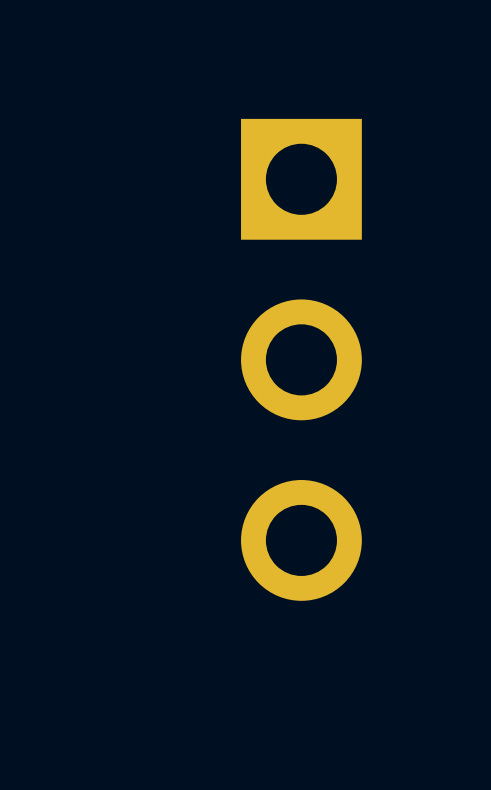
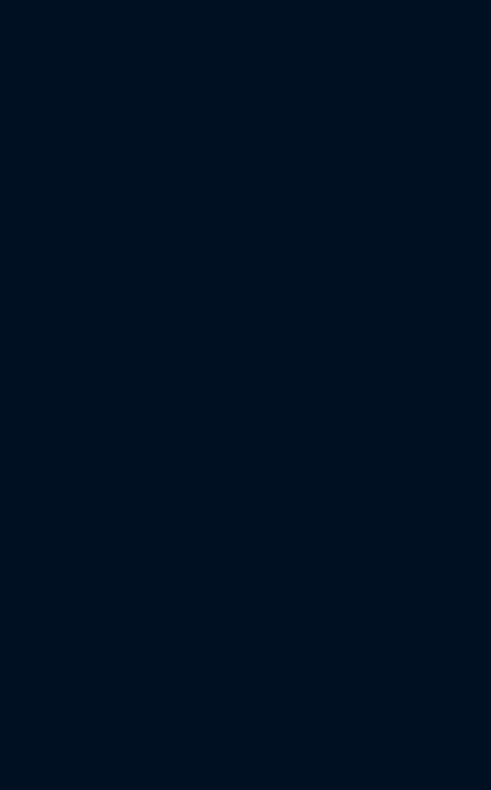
part: (301, 359) -> none

